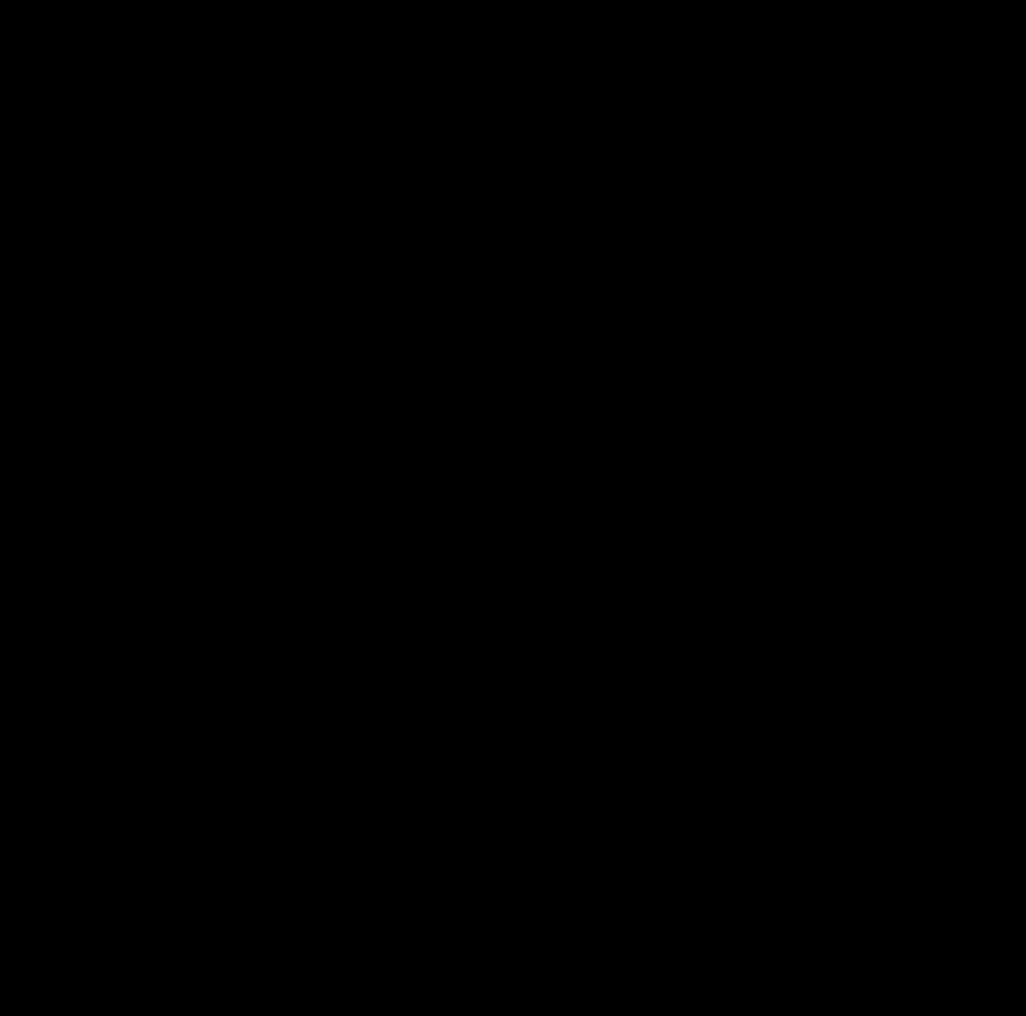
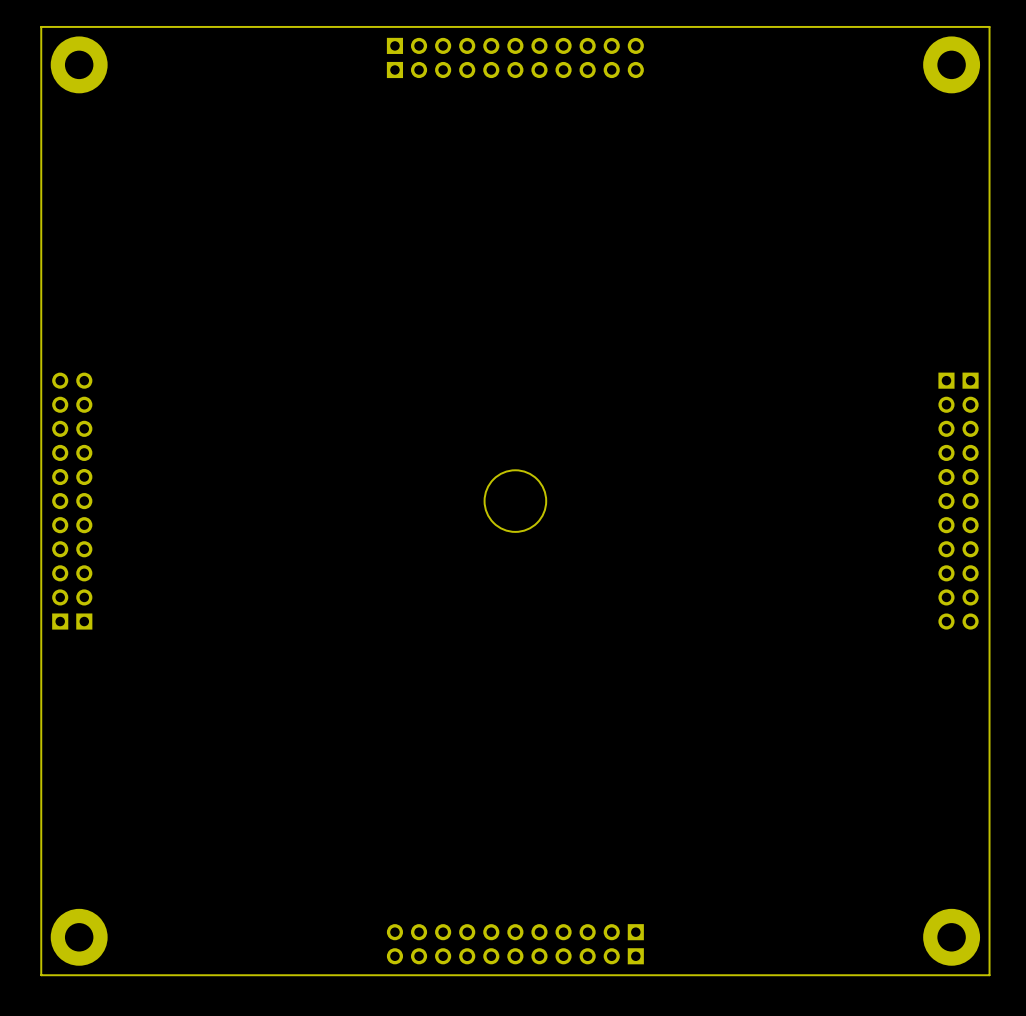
board edge: none -> (989, 26) (989, 975) (41, 975) (41, 26) (989, 26)
part: none -> (515, 45)
part: none -> (79, 64)
part: none -> (951, 64)
part: none -> (515, 70)
round board edge: none -> [484, 469, 547, 533]
part: none -> (60, 501)
part: none -> (84, 501)
part: none -> (946, 501)
part: none -> (970, 501)
part: none -> (515, 932)
part: none -> (79, 937)
part: none -> (951, 937)
part: none -> (515, 956)

